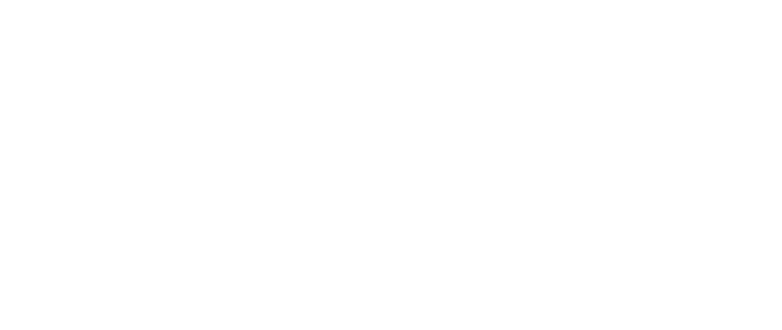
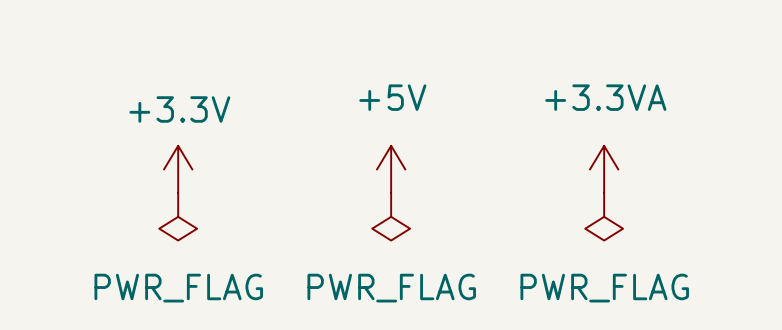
power symbol: none -> +3.3V (178, 169)
power symbol: none -> +5V (391, 169)
power symbol: none -> +3.3VA (604, 169)
power symbol: none -> PWR_FLAG (178, 216)
power symbol: none -> PWR_FLAG (391, 216)
power symbol: none -> PWR_FLAG (604, 216)

